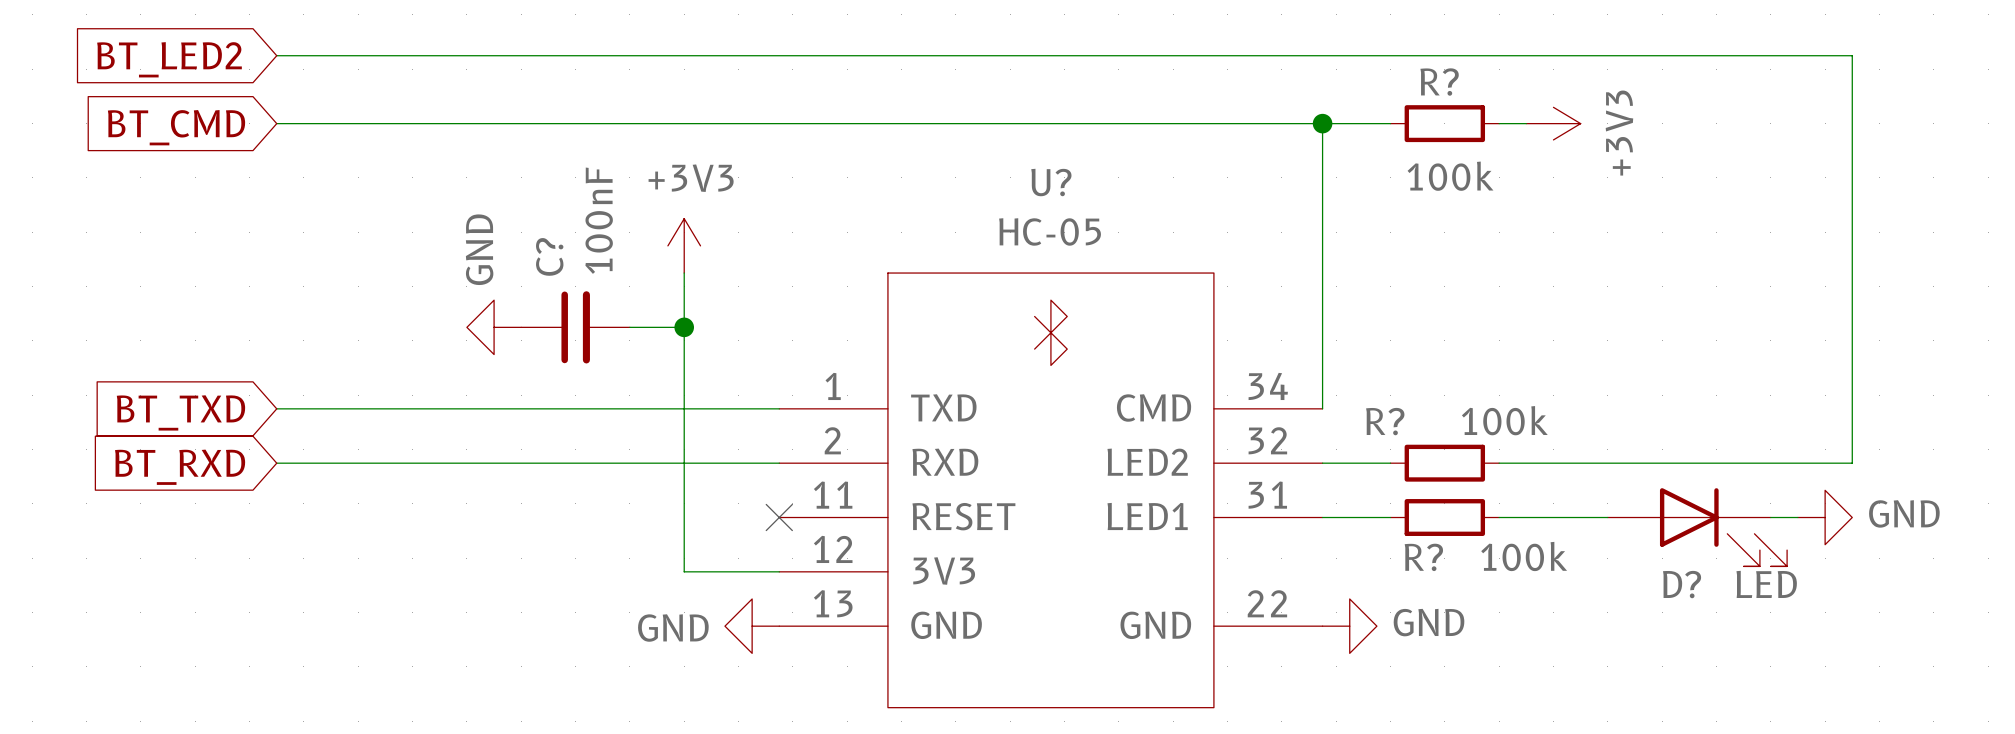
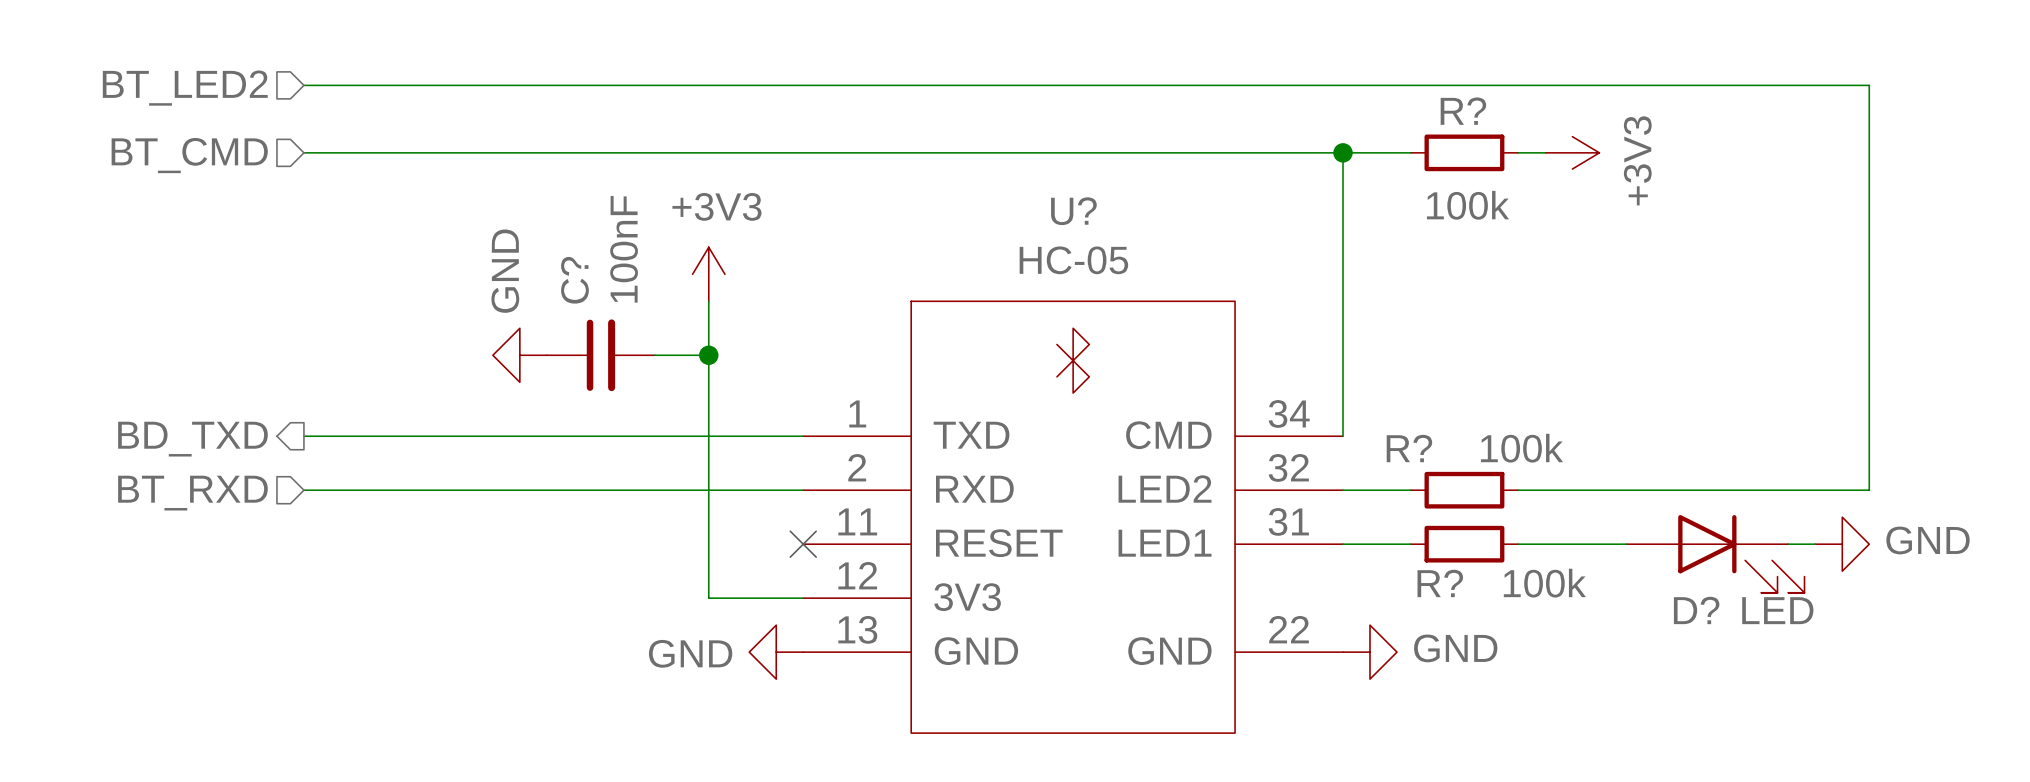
hierarchical label: none -> BT_LED2 (185, 88)
global label: BT_LED2 (169, 59) -> none
hierarchical label: none -> BT_CMD (189, 155)
global label: BT_CMD (176, 127) -> none
hierarchical label: none -> BD_TXD (192, 439)
global label: BT_TXD (180, 412) -> none
hierarchical label: none -> BT_RXD (192, 493)
global label: BT_RXD (180, 467) -> none

